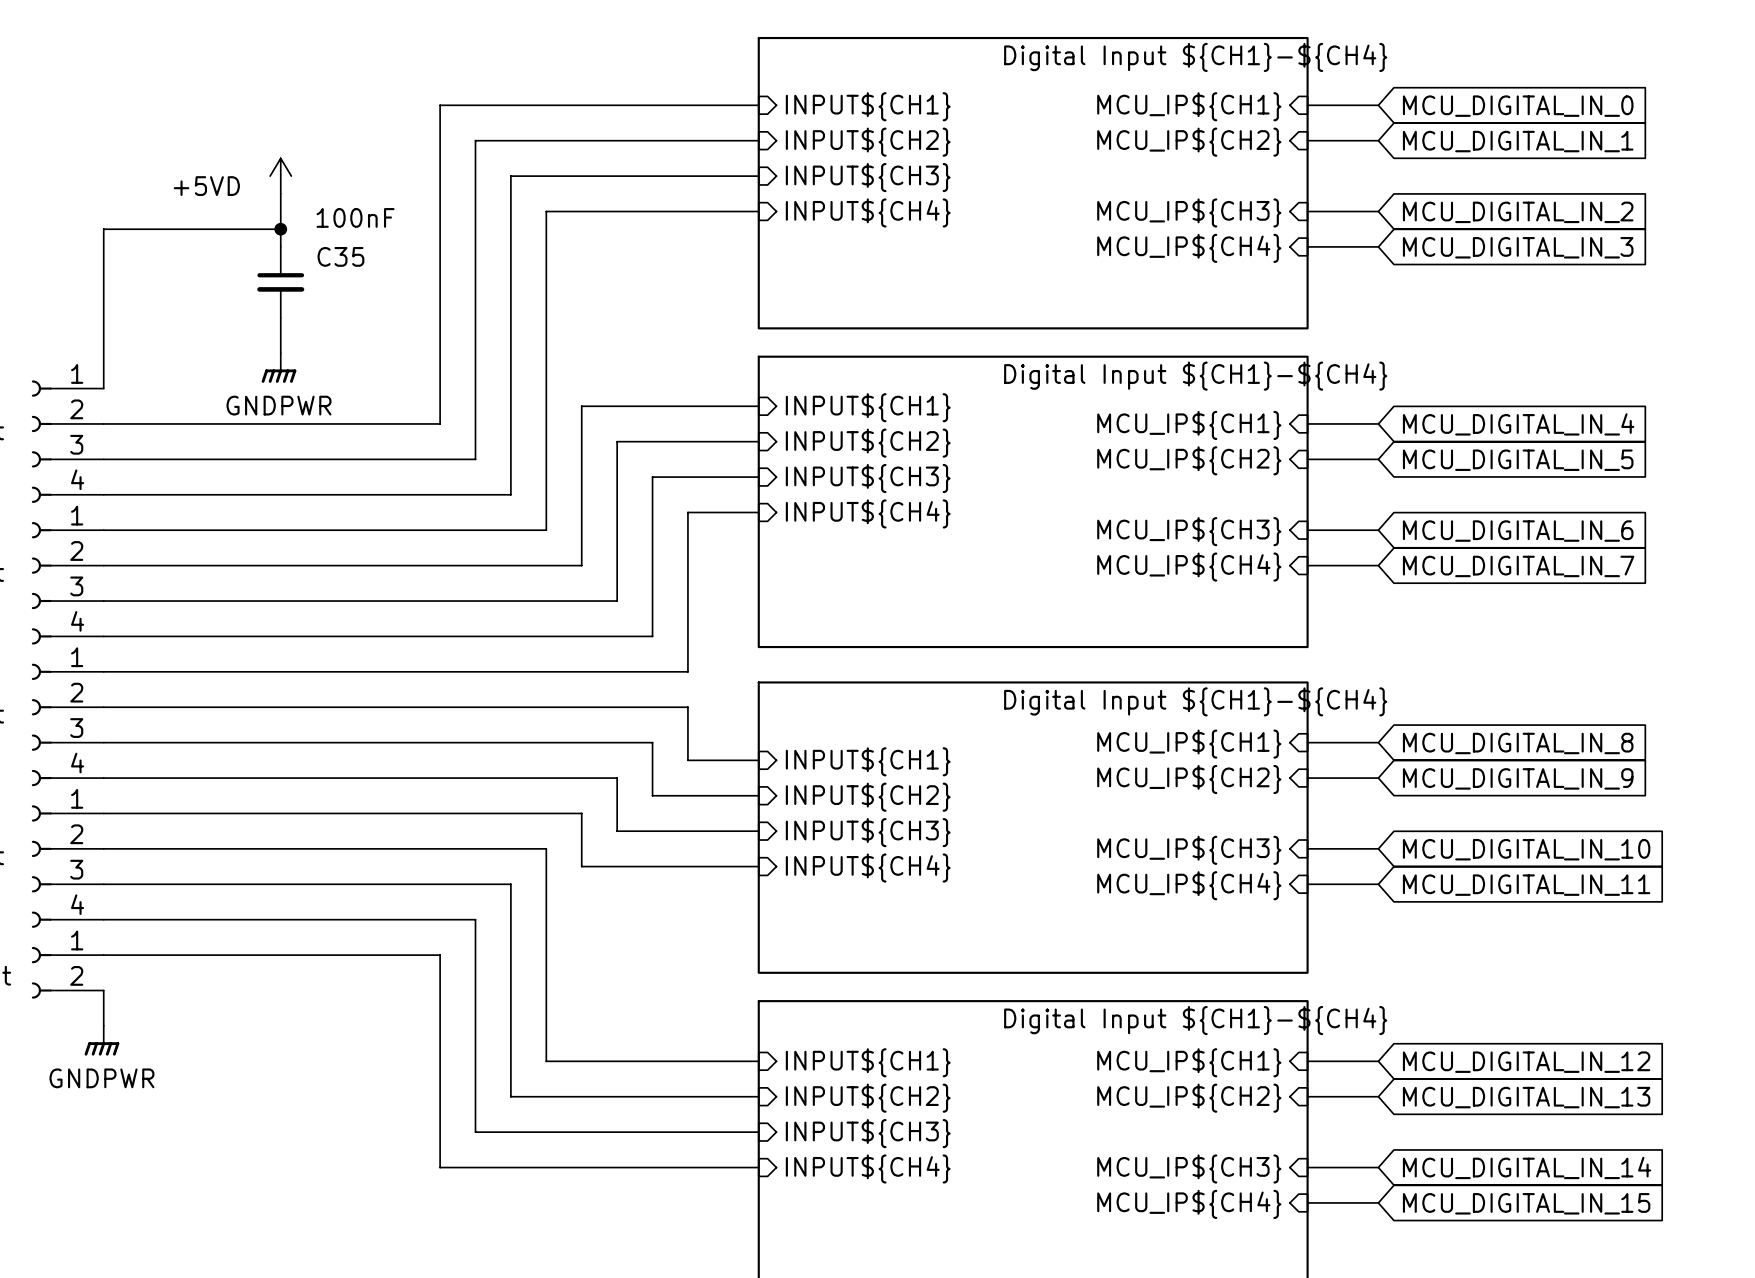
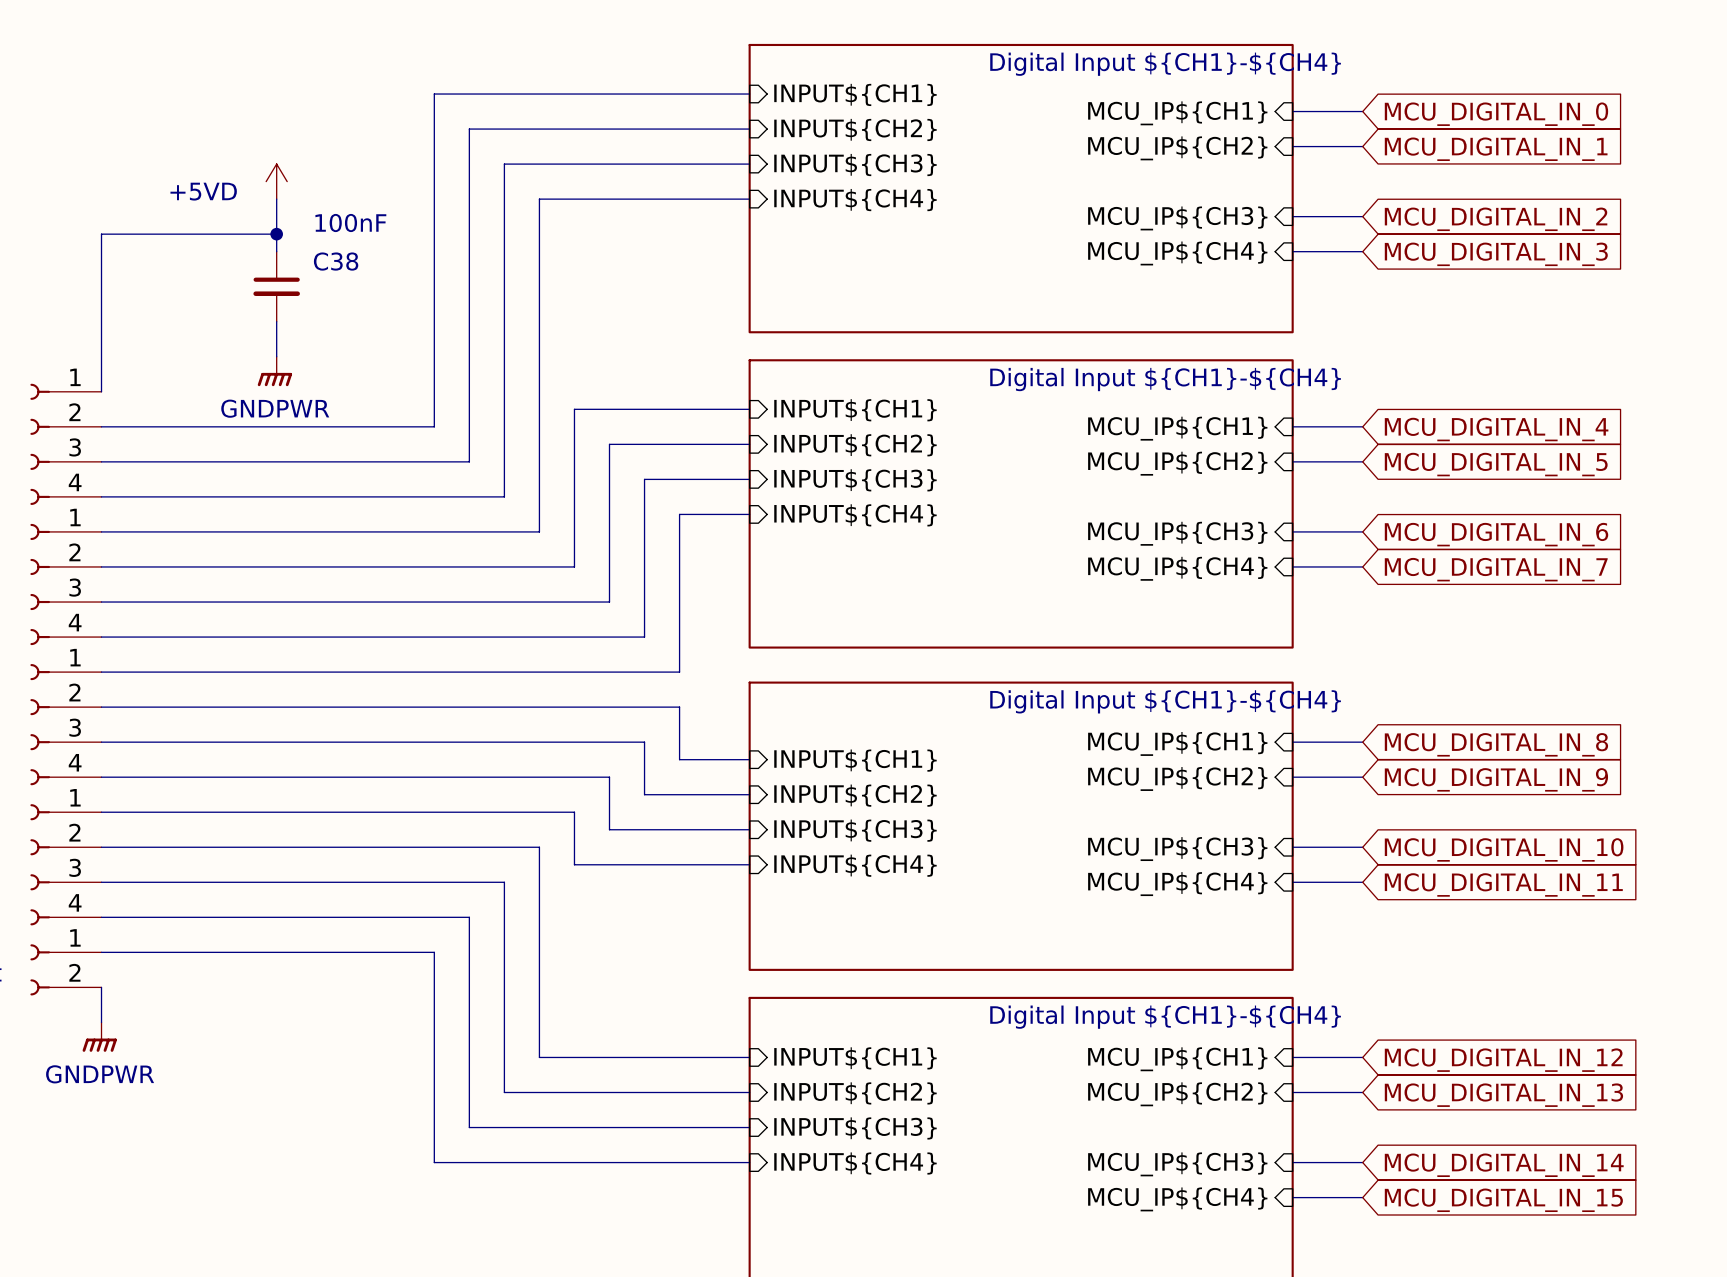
wire: (440, 105) (758, 105) -> (434, 111) (434, 94) (749, 94)
sheet pin position: INPUT${CH1} (868, 106) -> INPUT${CH1} (855, 94)
wire: (475, 140) (758, 140) -> (469, 146) (469, 129) (749, 129)
sheet pin position: INPUT${CH2} (868, 142) -> INPUT${CH2} (855, 129)
wire: (510, 176) (758, 176) -> (504, 181) (504, 164) (749, 164)
sheet pin position: INPUT${CH3} (868, 177) -> INPUT${CH3} (855, 165)
wire: (546, 211) (758, 211) -> (539, 216) (539, 199) (749, 199)
sheet pin position: INPUT${CH4} (868, 212) -> INPUT${CH4} (855, 200)
C35 name: C35 (340, 256) -> C38 (336, 261)

